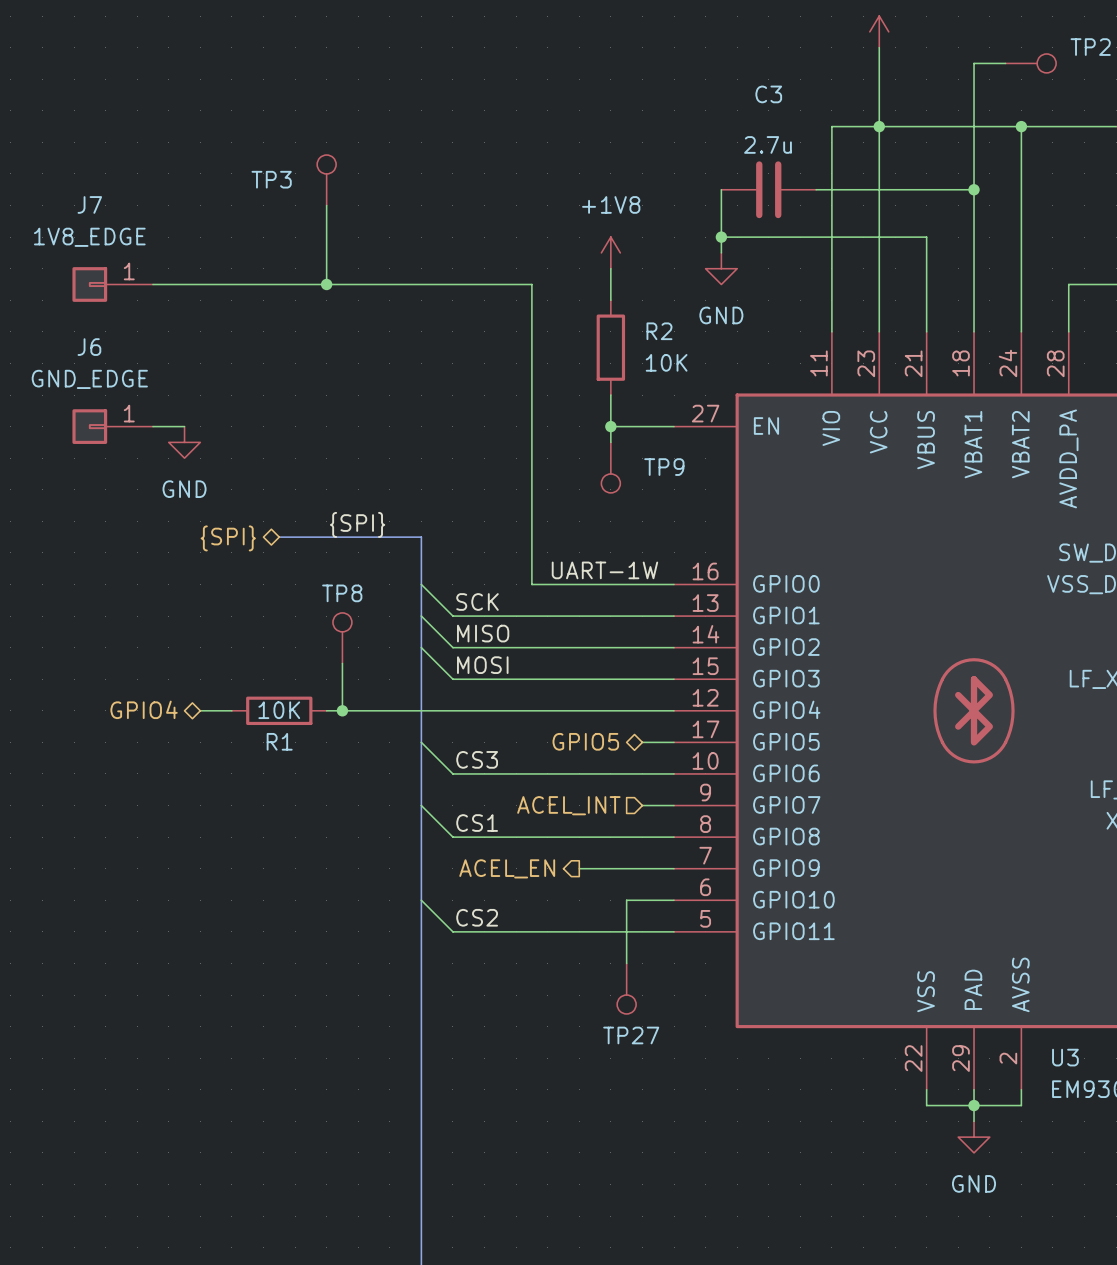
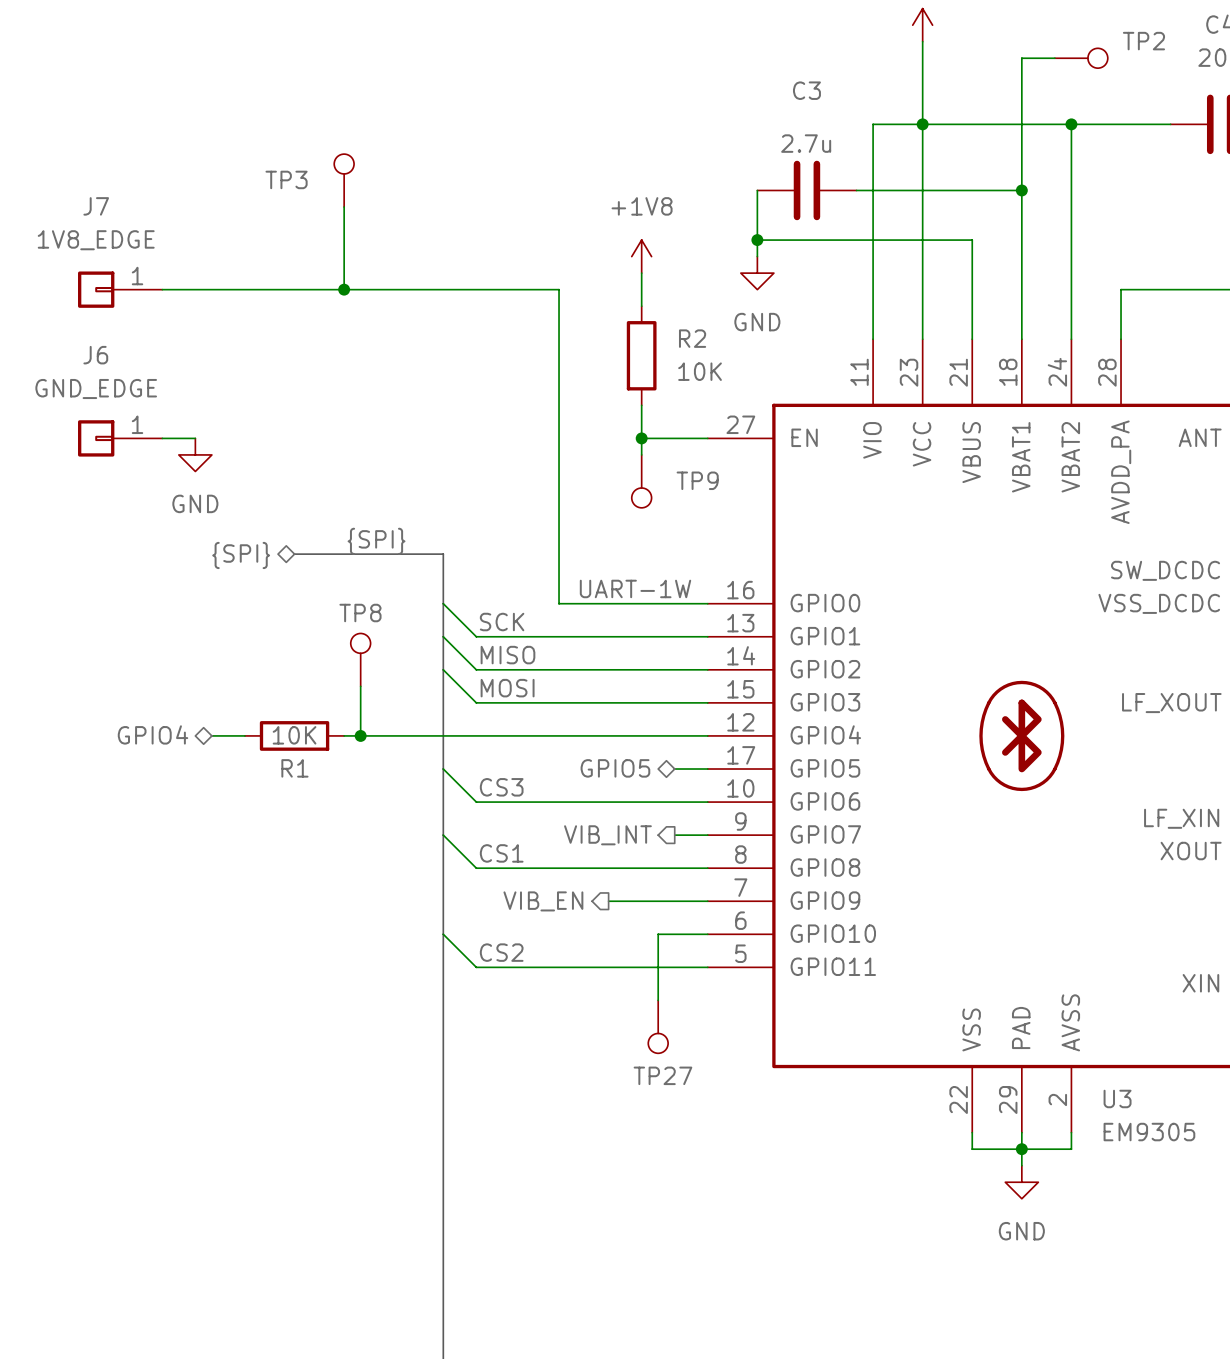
hierarchical label shape: input (568, 805) -> output (607, 835)
hierarchical label: ACEL_INT (568, 805) -> VIB_INT (607, 835)
hierarchical label: ACEL_EN (507, 868) -> VIB_EN (543, 901)

